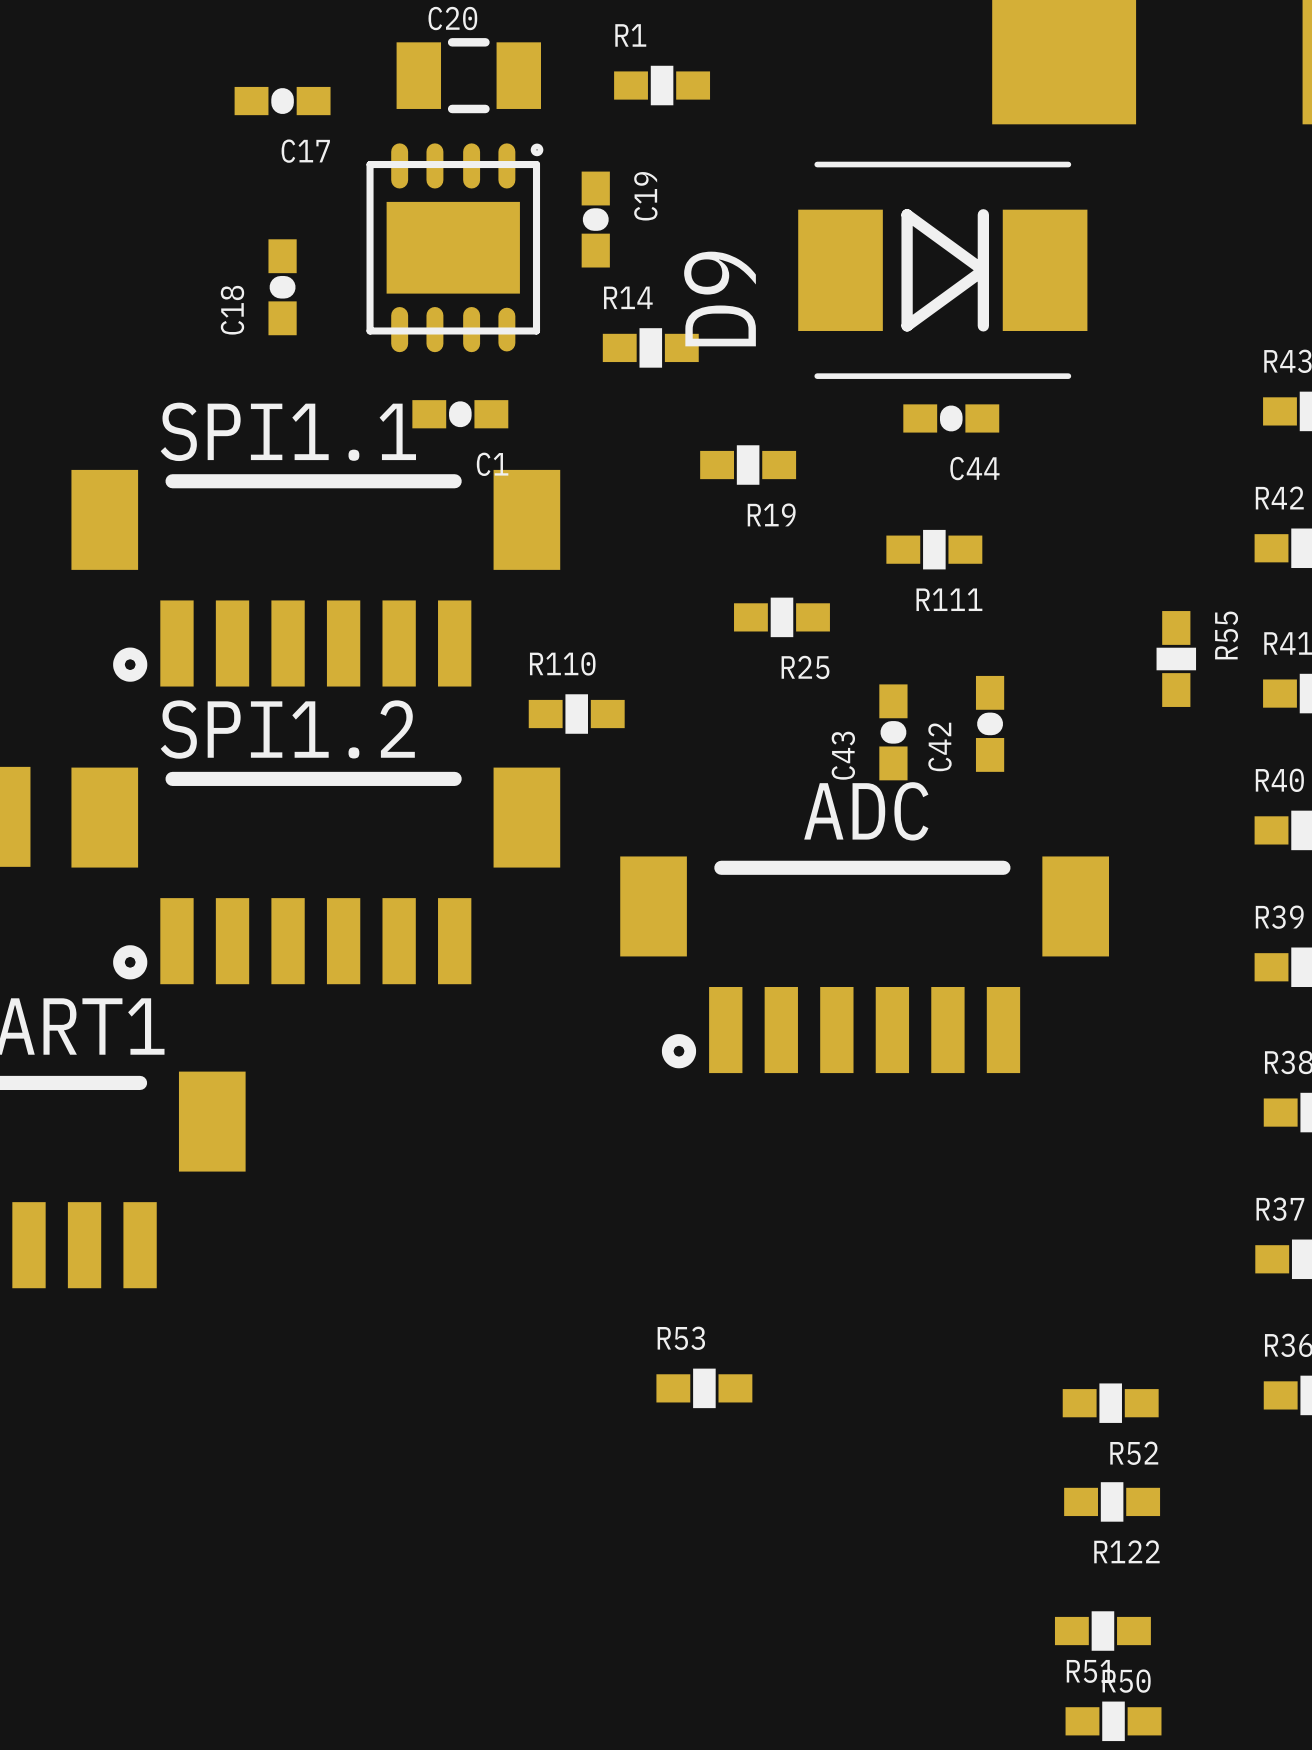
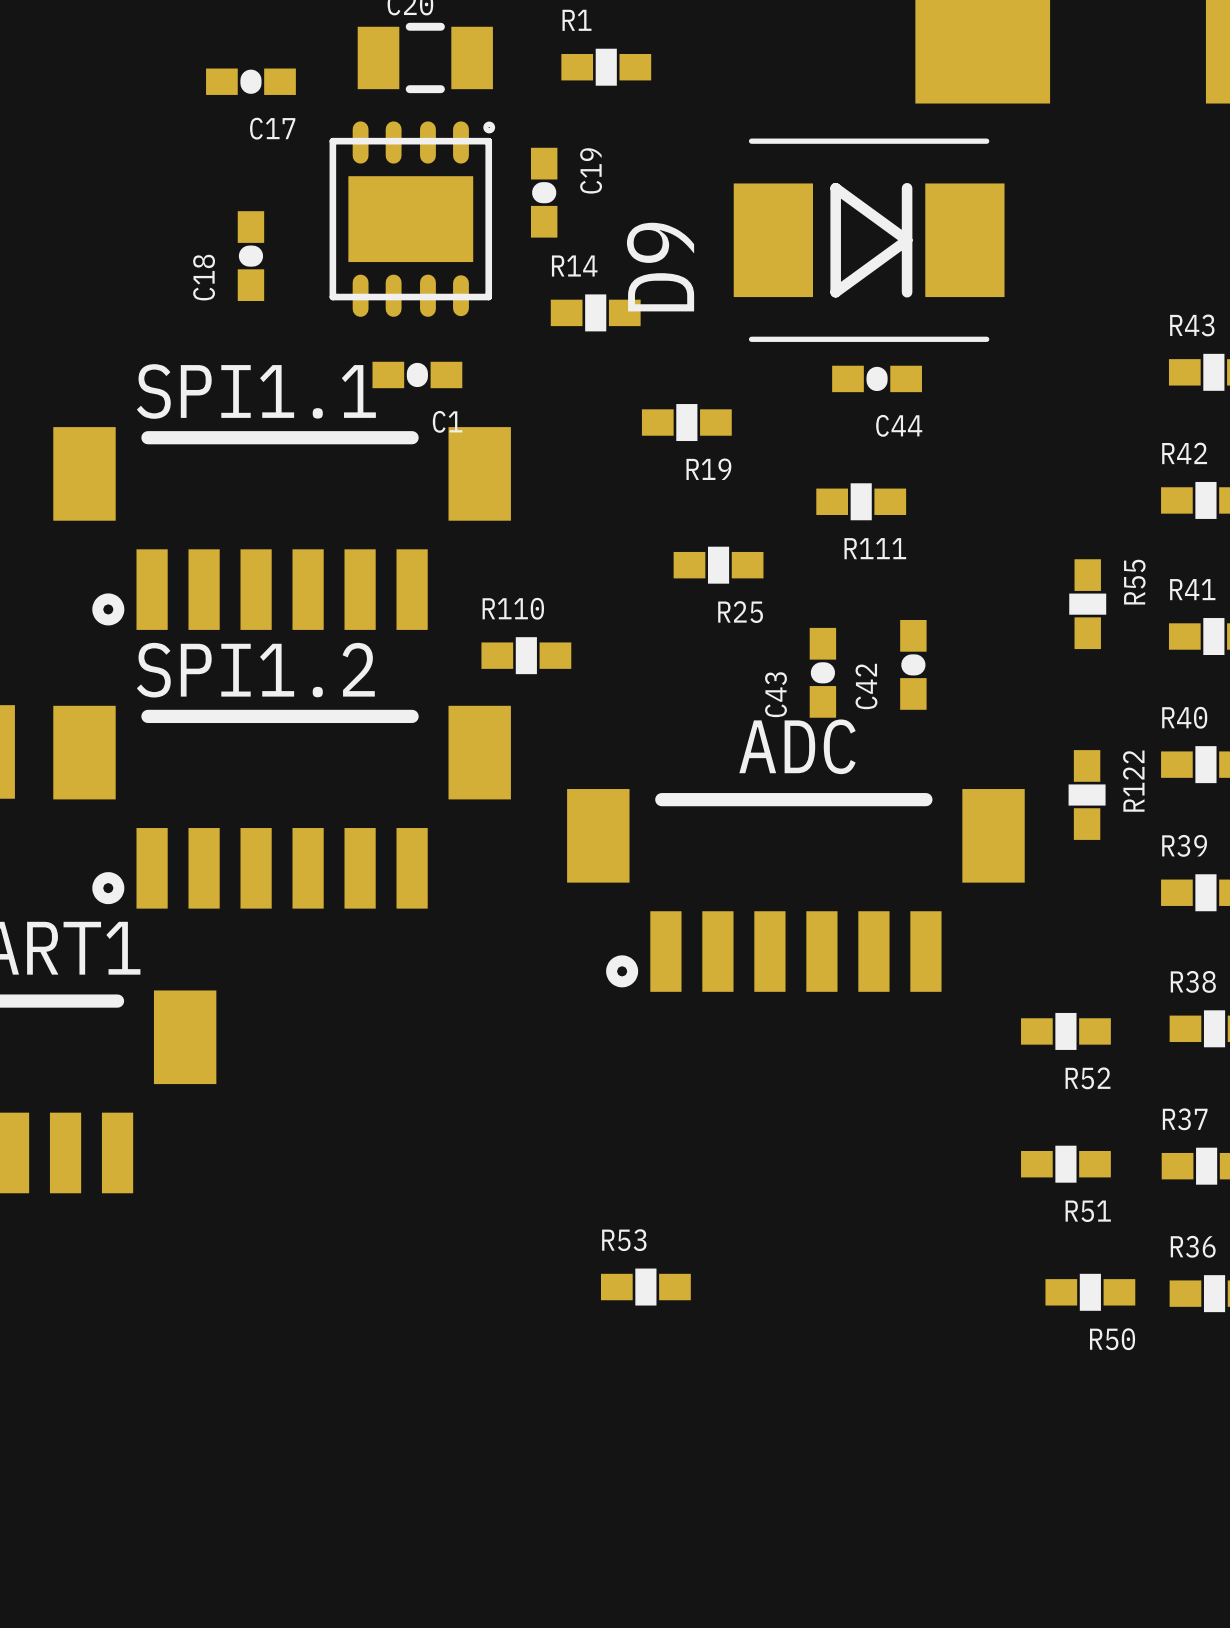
R52 position: (1110, 1403) -> (1065, 1031)
R122 rotation: 0° (1112, 1501) -> 90° clockwise (1087, 795)
R122 position: (1112, 1501) -> (1087, 795)
R50 position: (1102, 1631) -> (1090, 1292)
R51 name position: R51 (1090, 1671) -> R51 (1088, 1211)
R51 position: (1113, 1721) -> (1065, 1164)

